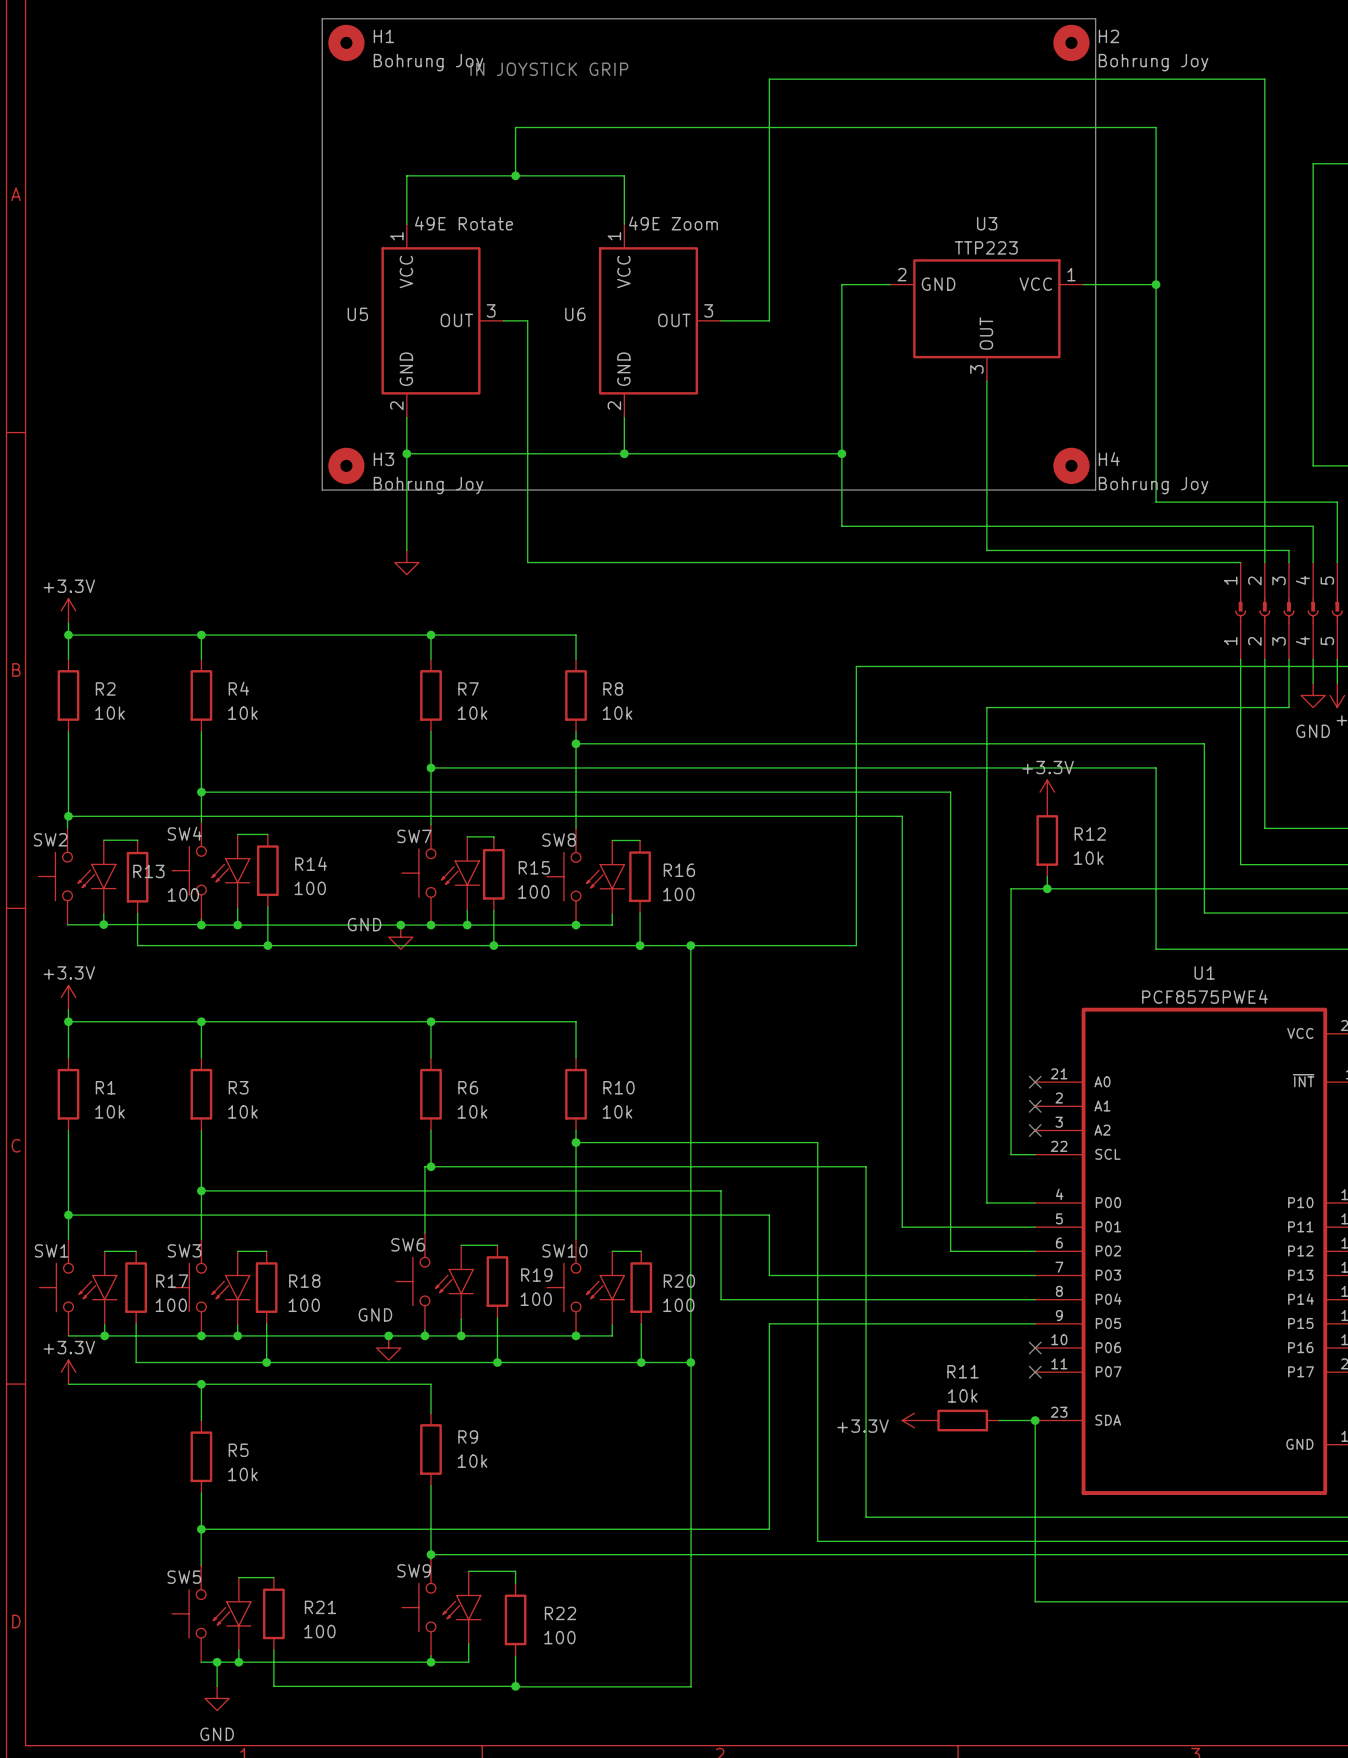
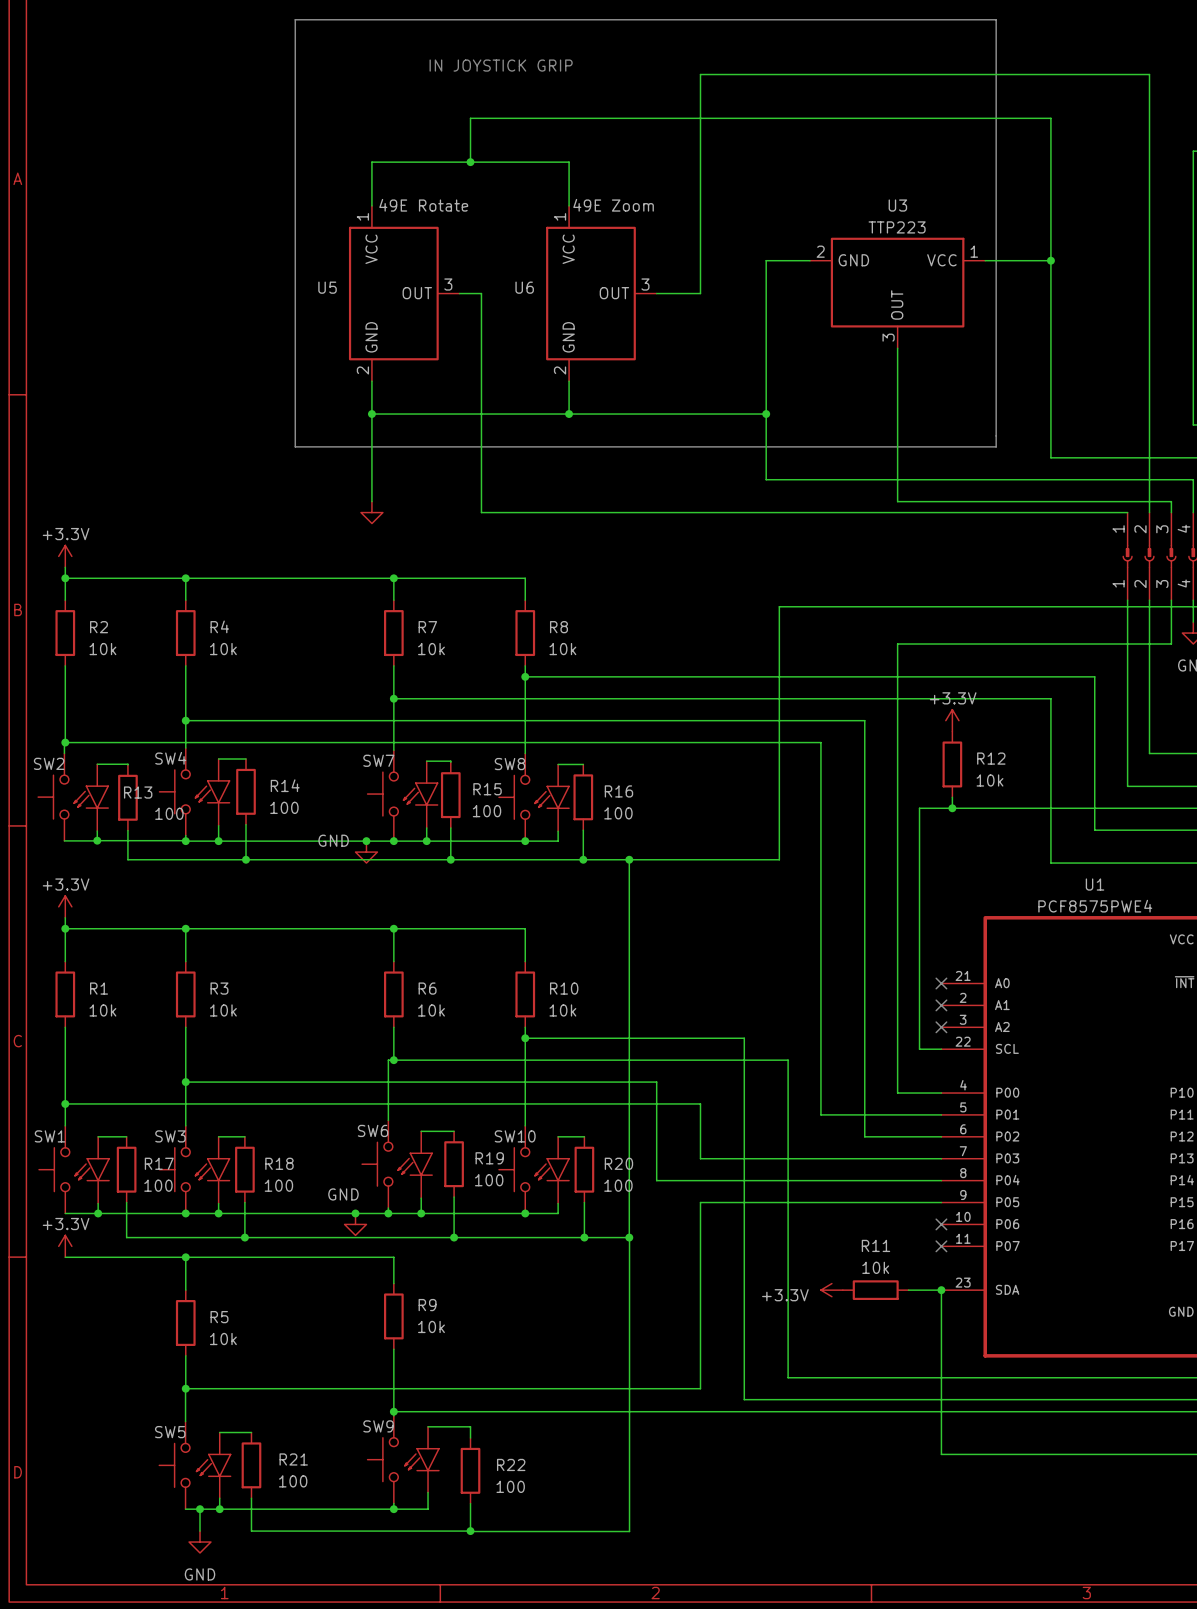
H1: Bohrung Joy (346, 42) -> none
H2: Bohrung Joy (1071, 42) -> none
H3: Bohrung Joy (346, 465) -> none
H4: Bohrung Joy (1071, 465) -> none

